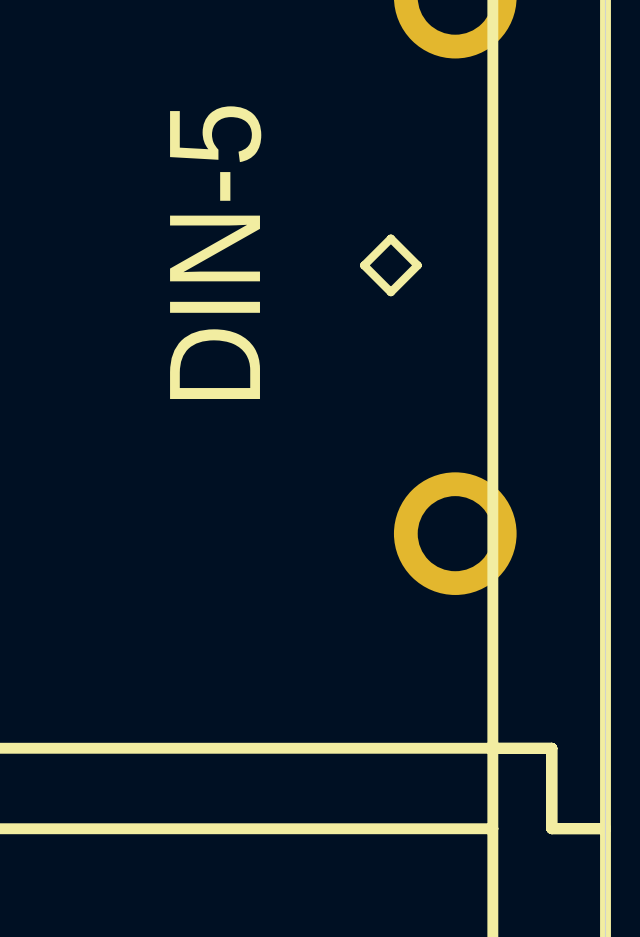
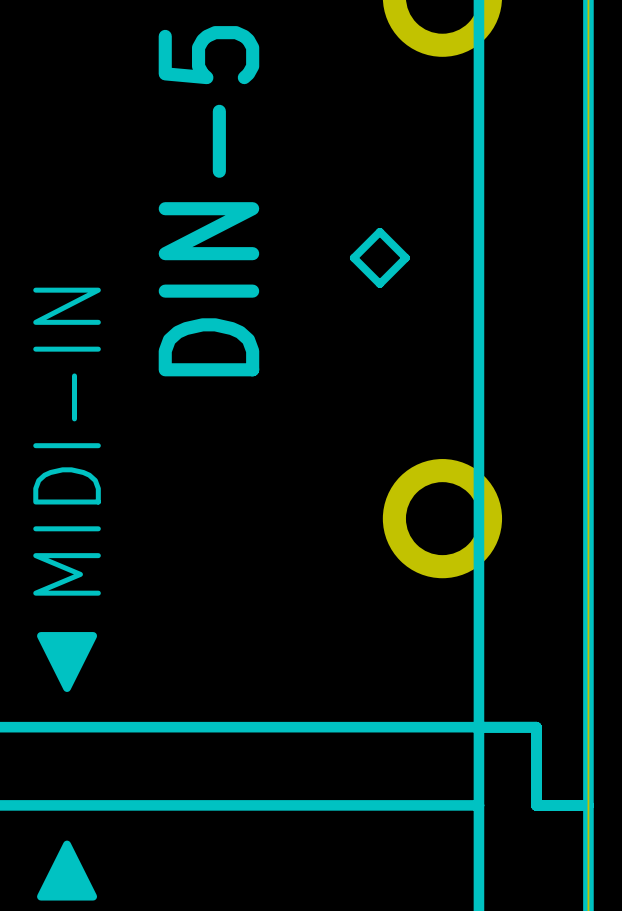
text: none -> MIDI-IN (67, 441)
drawing: none -> [37, 632, 98, 692]
drawing: none -> [37, 840, 98, 901]

